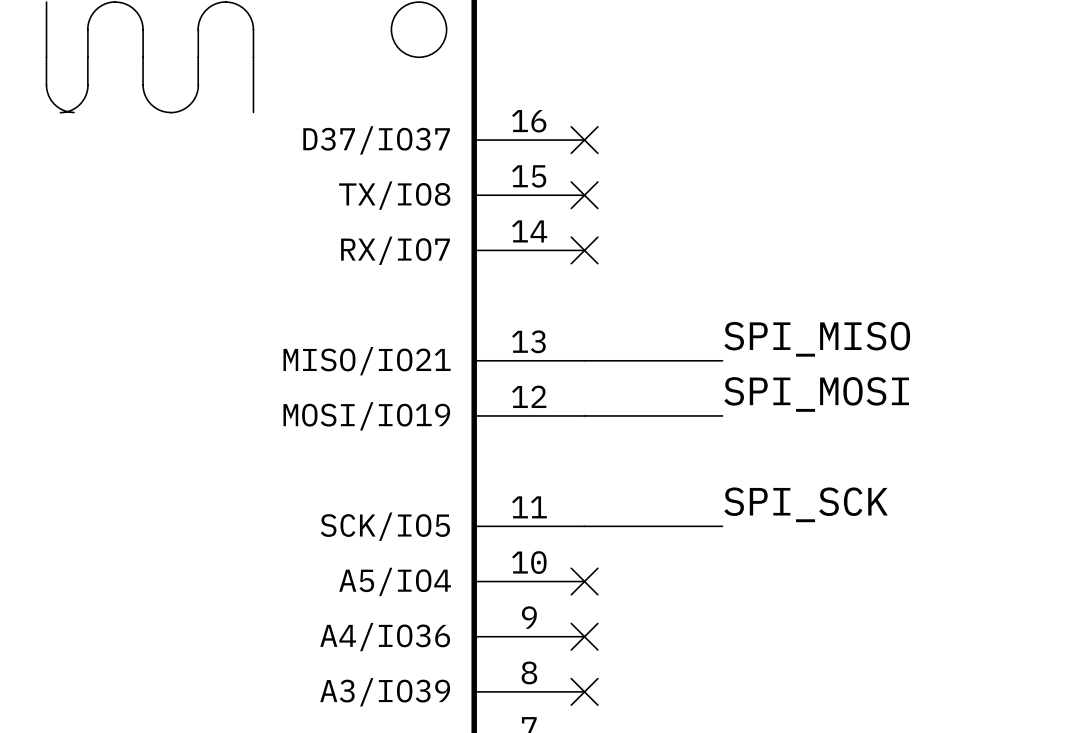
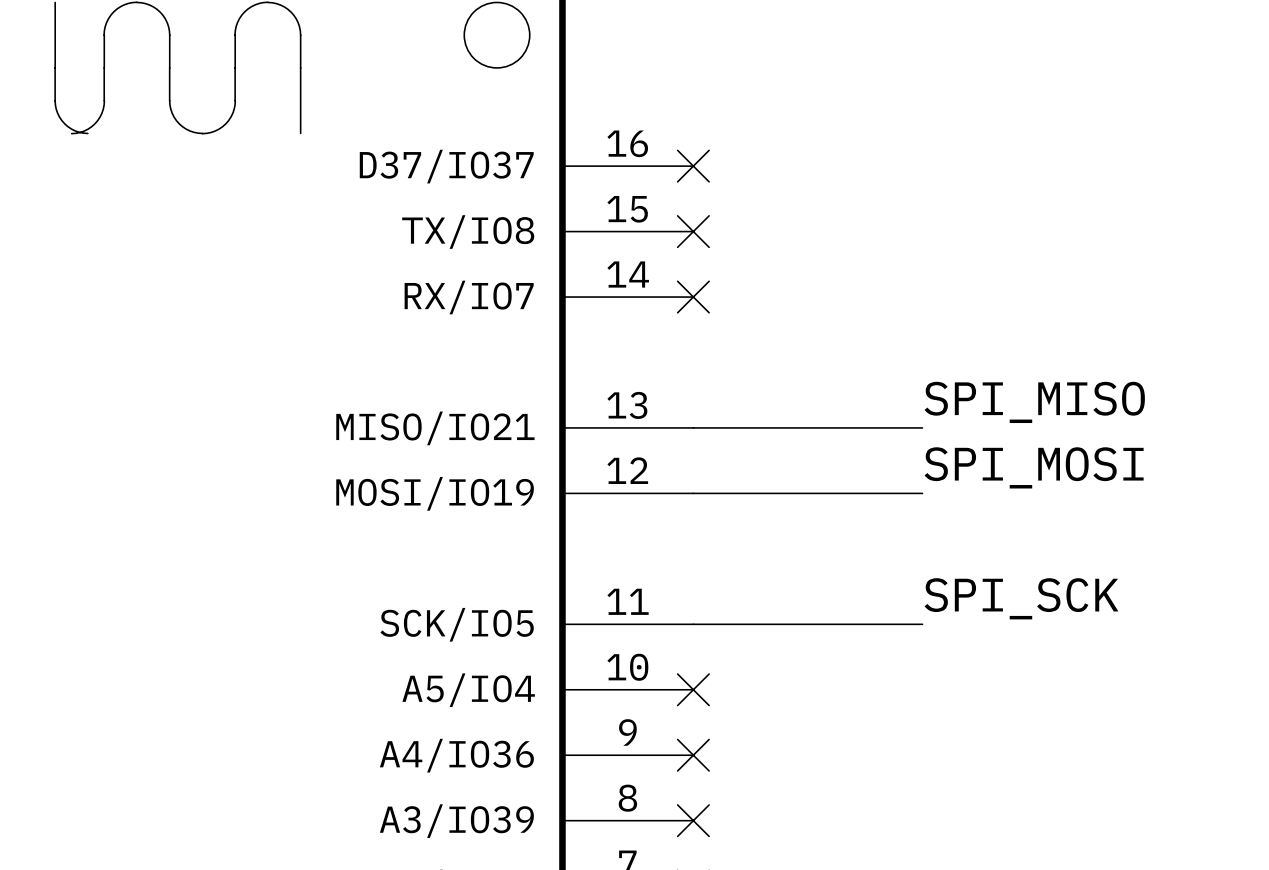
label position: SPI_MISO (817, 339) -> SPI_MISO (1034, 402)
wire: none -> (857, 427) (922, 427)
label position: SPI_MOSI (816, 394) -> SPI_MOSI (1034, 467)
wire: none -> (857, 493) (922, 493)
label position: SPI_SCK (806, 504) -> SPI_SCK (1021, 598)
wire: none -> (857, 624) (922, 624)

